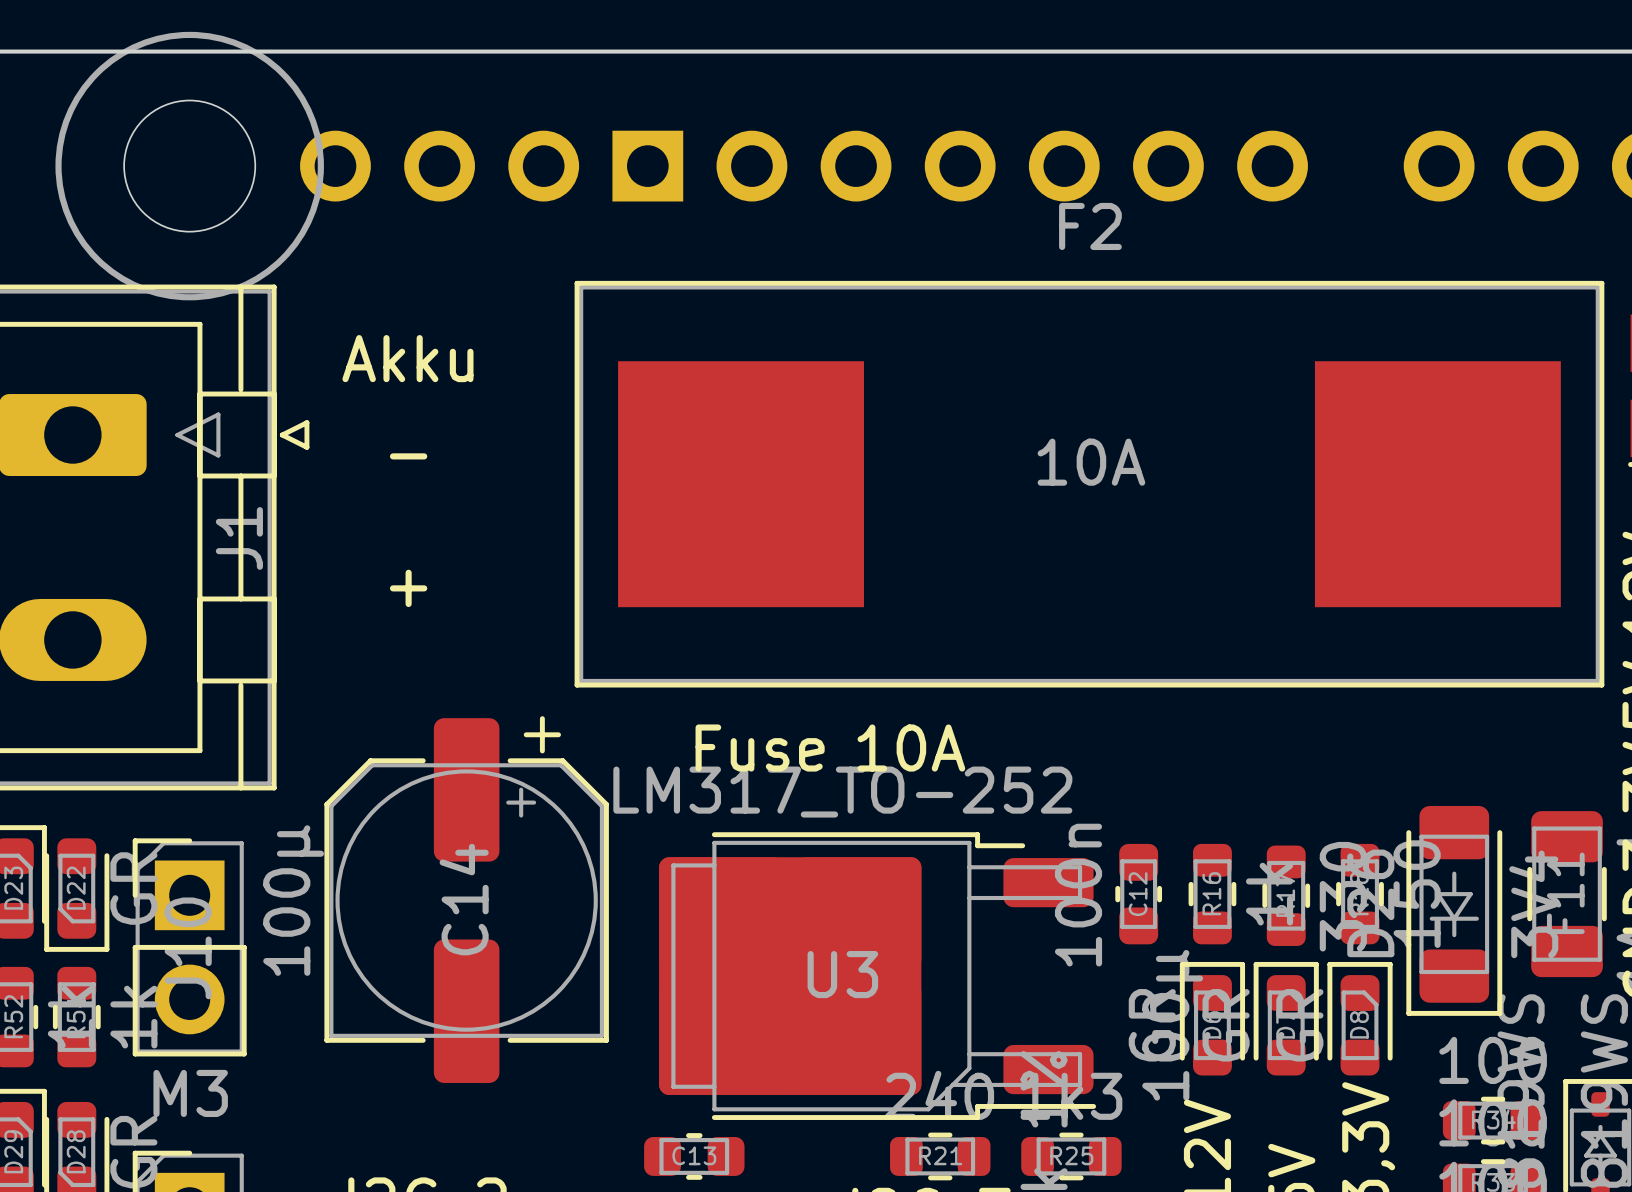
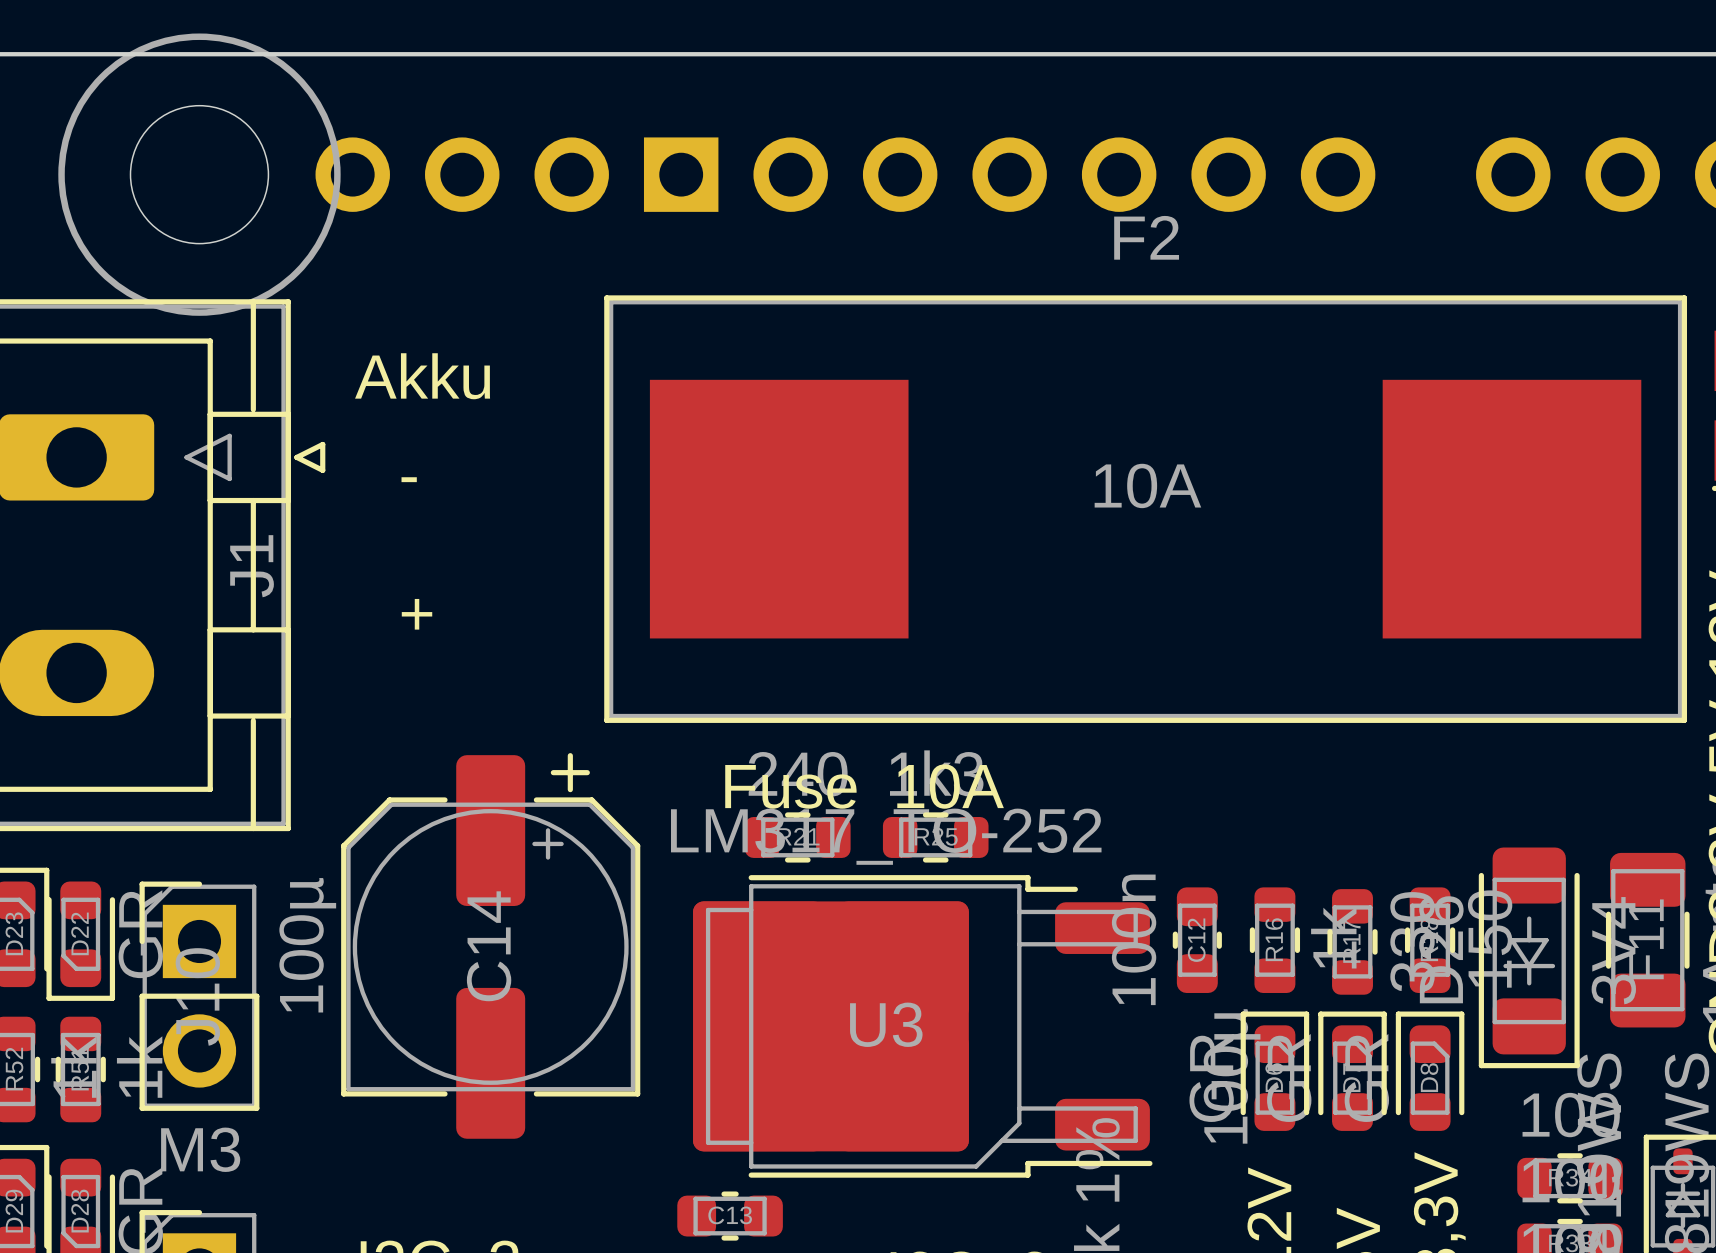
R21 position: (940, 1156) -> (797, 837)
R25 position: (1071, 1156) -> (935, 837)

